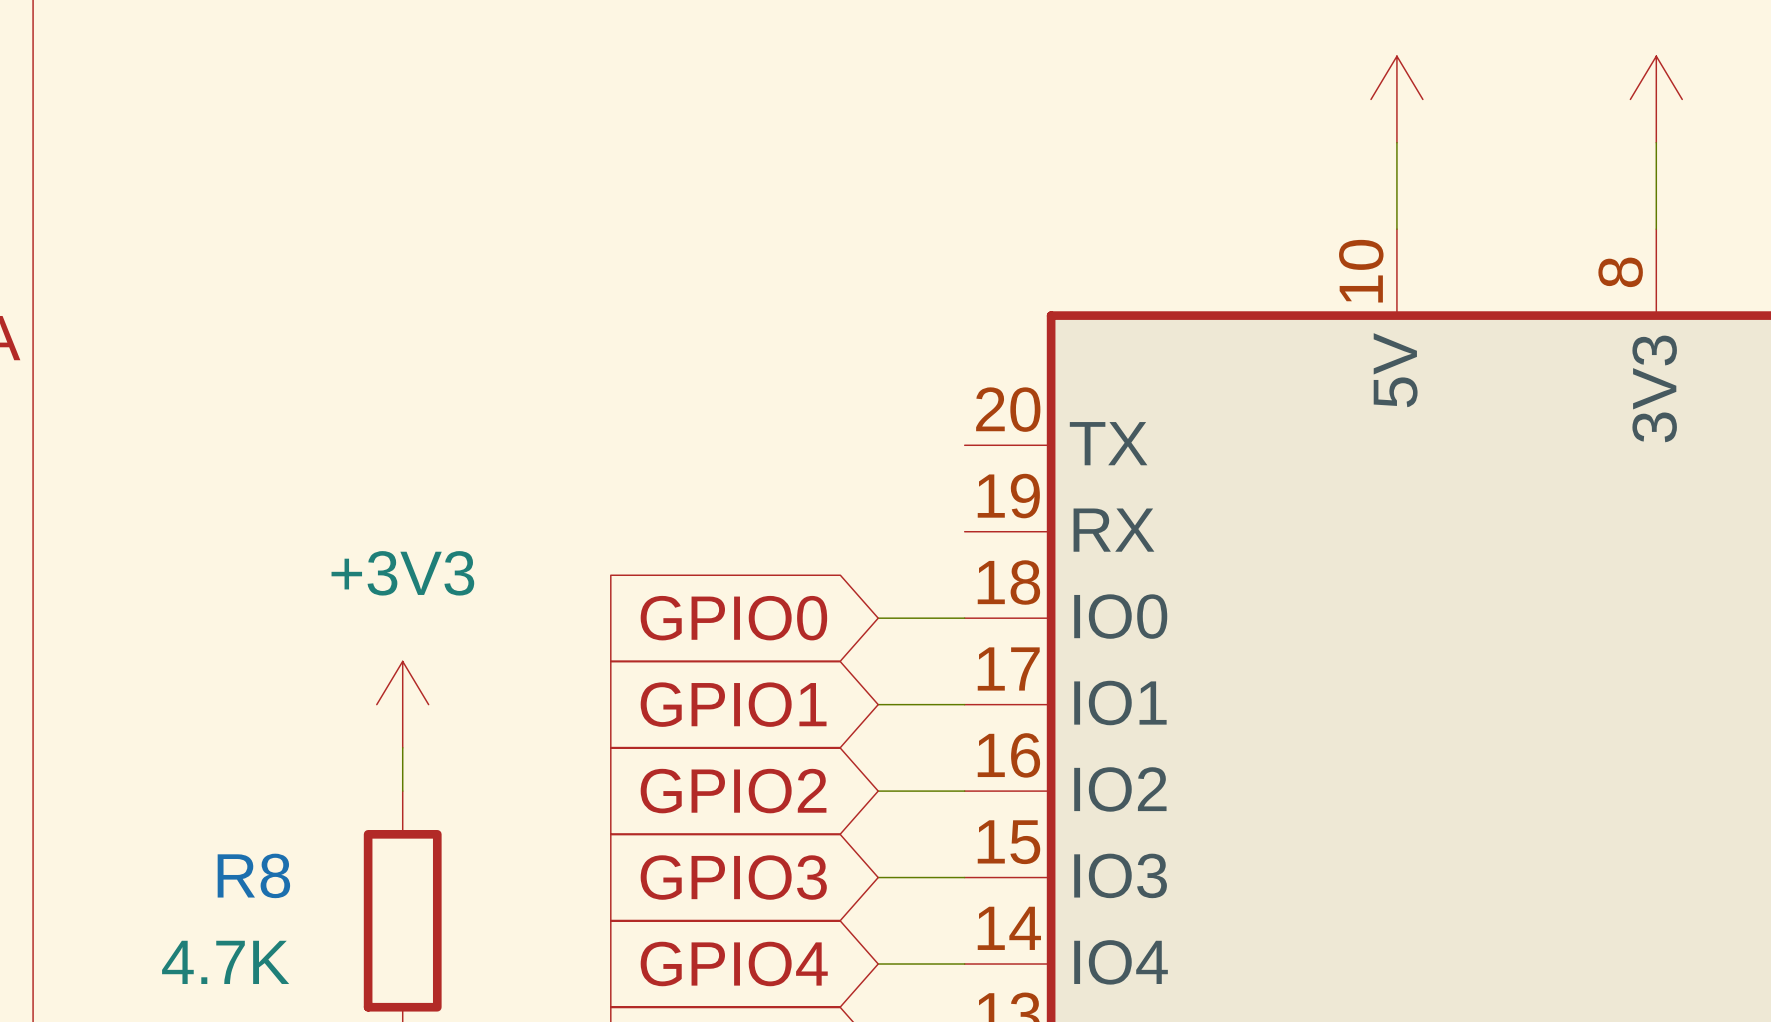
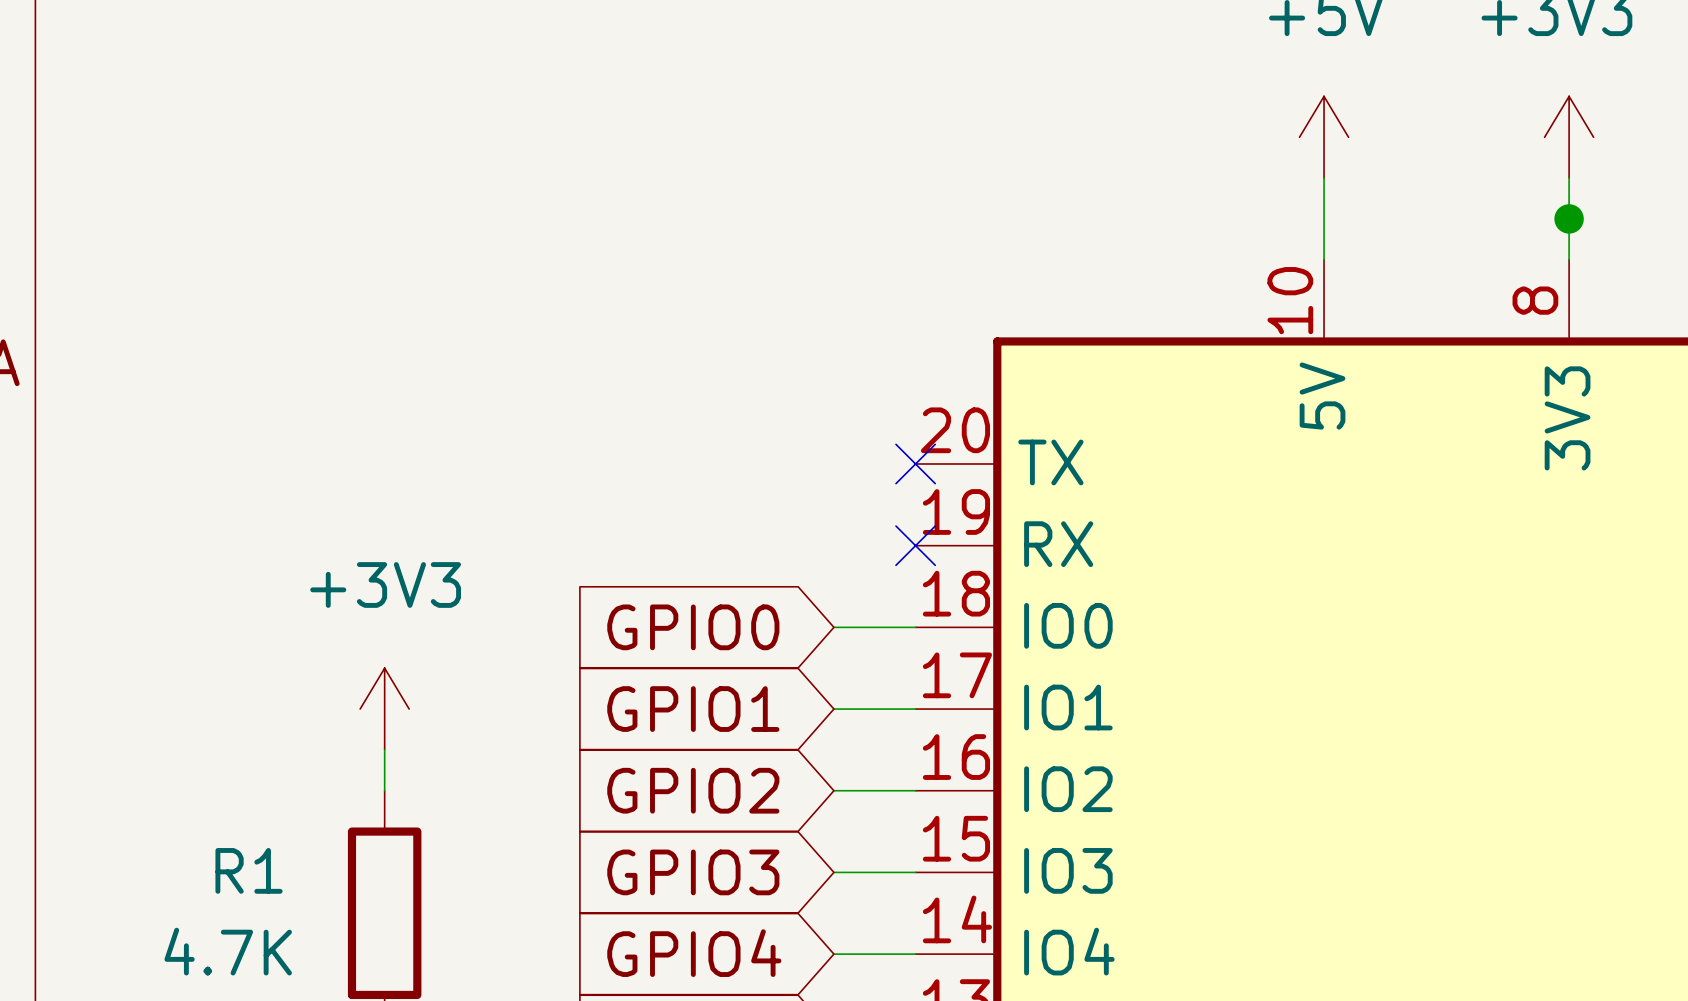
junction: none -> (1569, 218)
no-connect mark: none -> (915, 463)
no-connect mark: none -> (915, 545)
R8 name: R8 (253, 875) -> R1 (249, 870)

